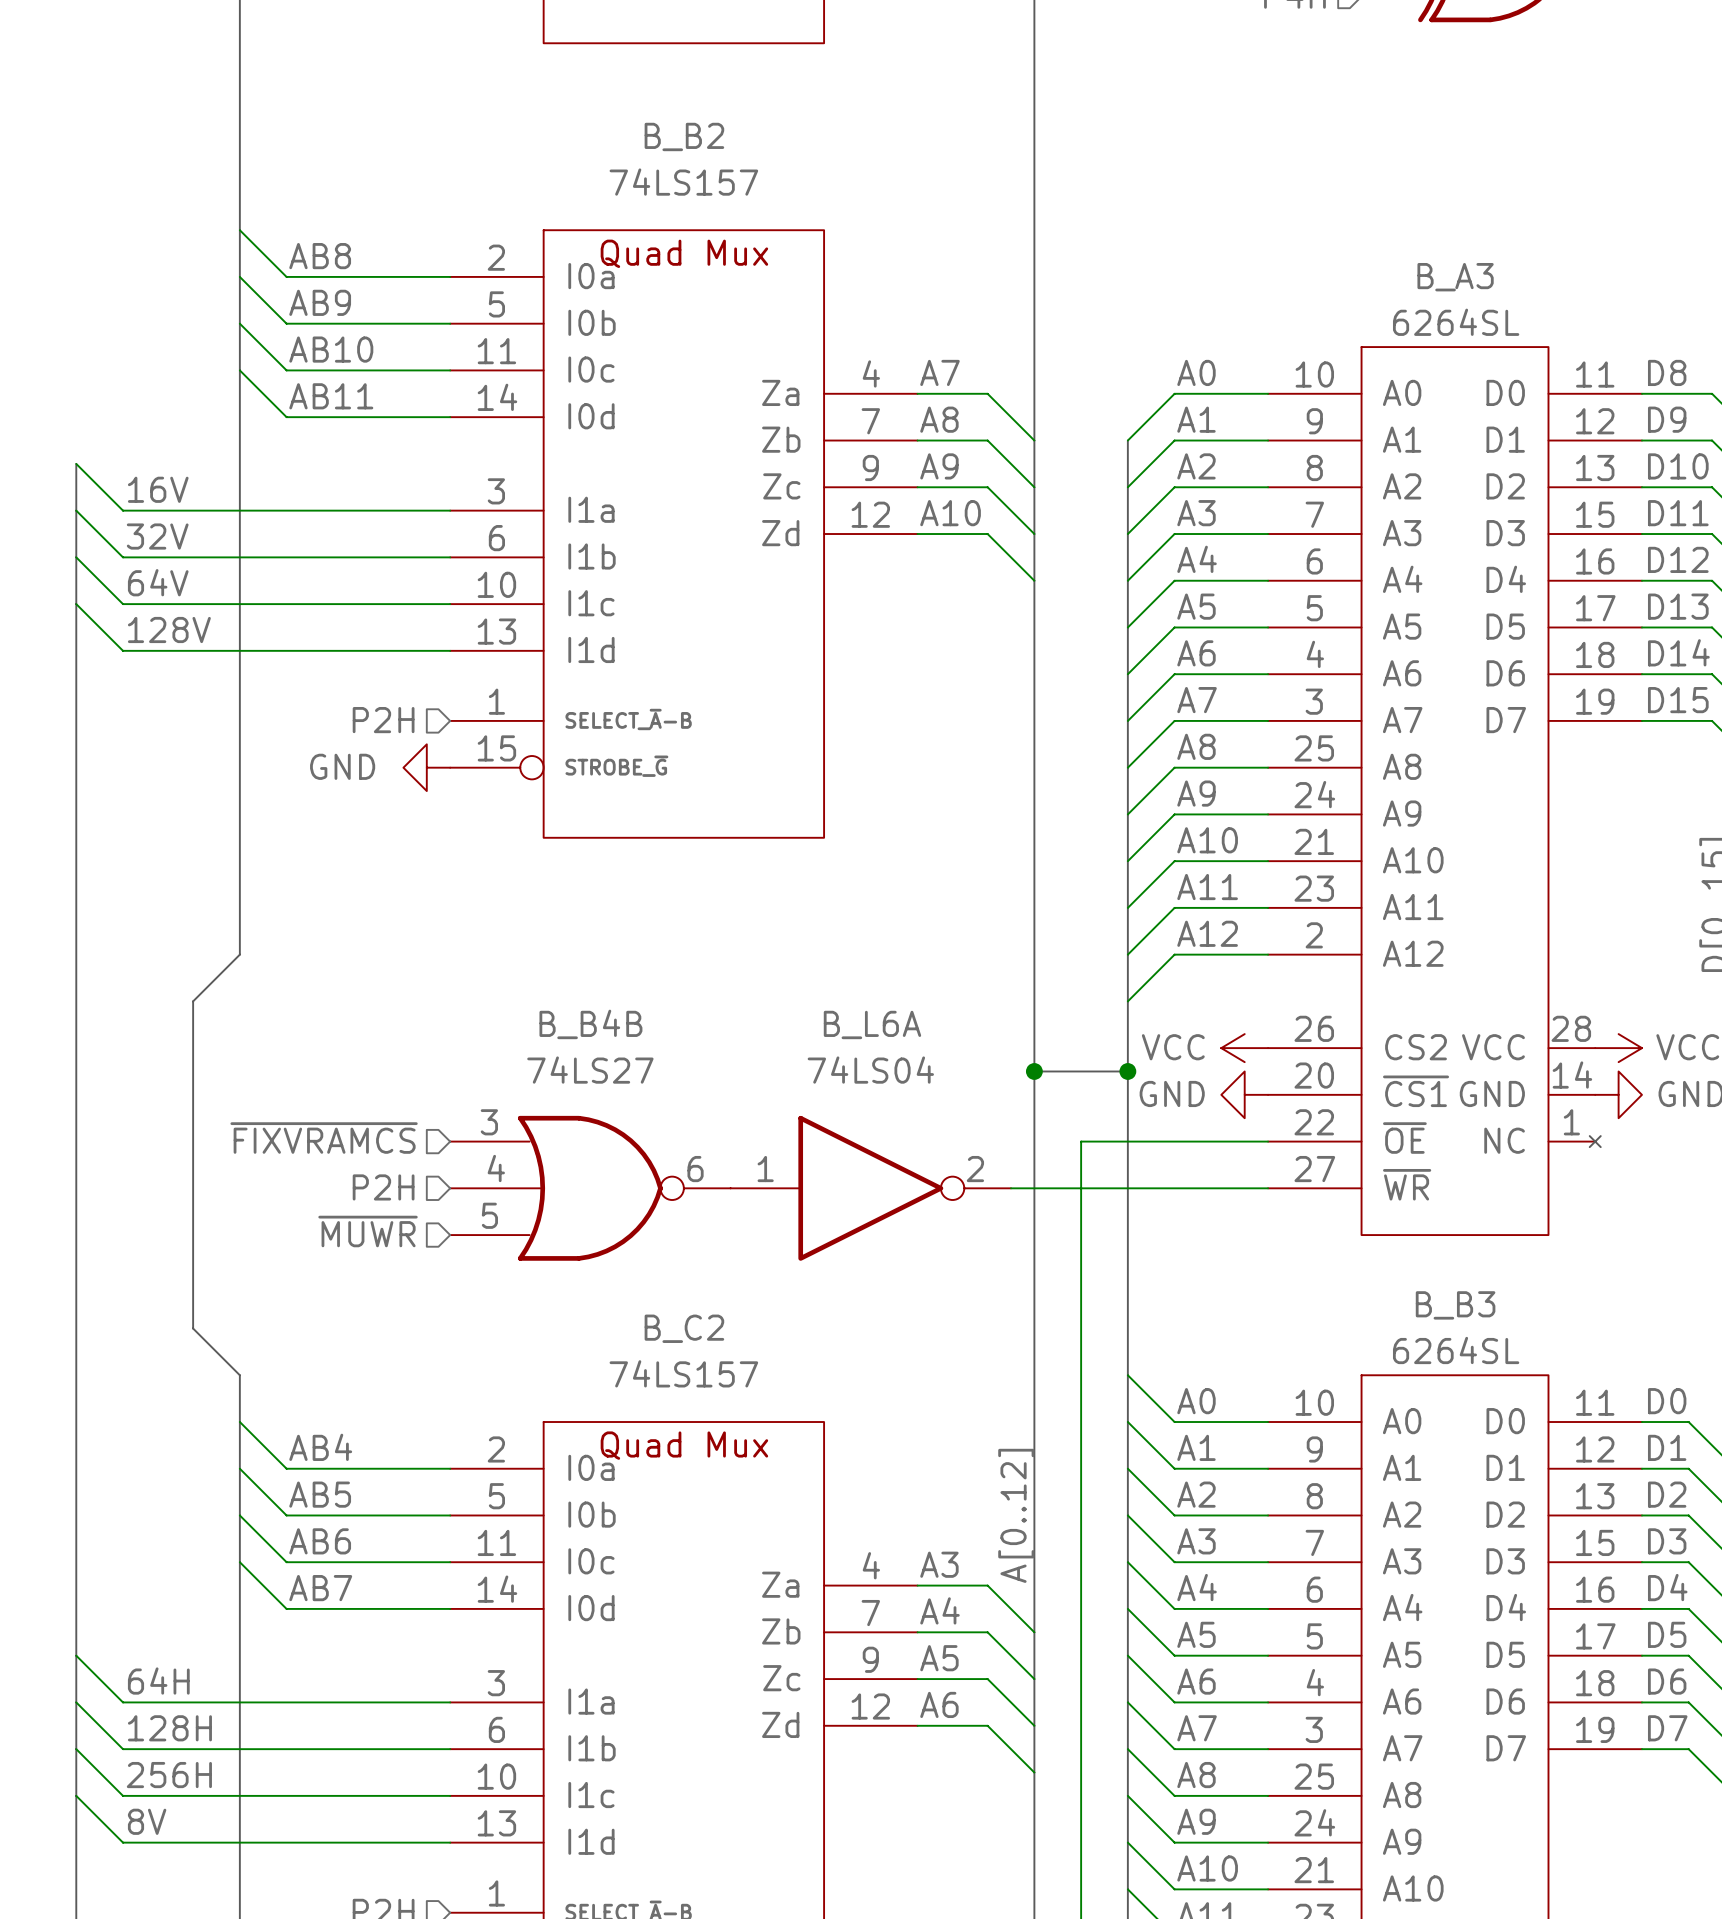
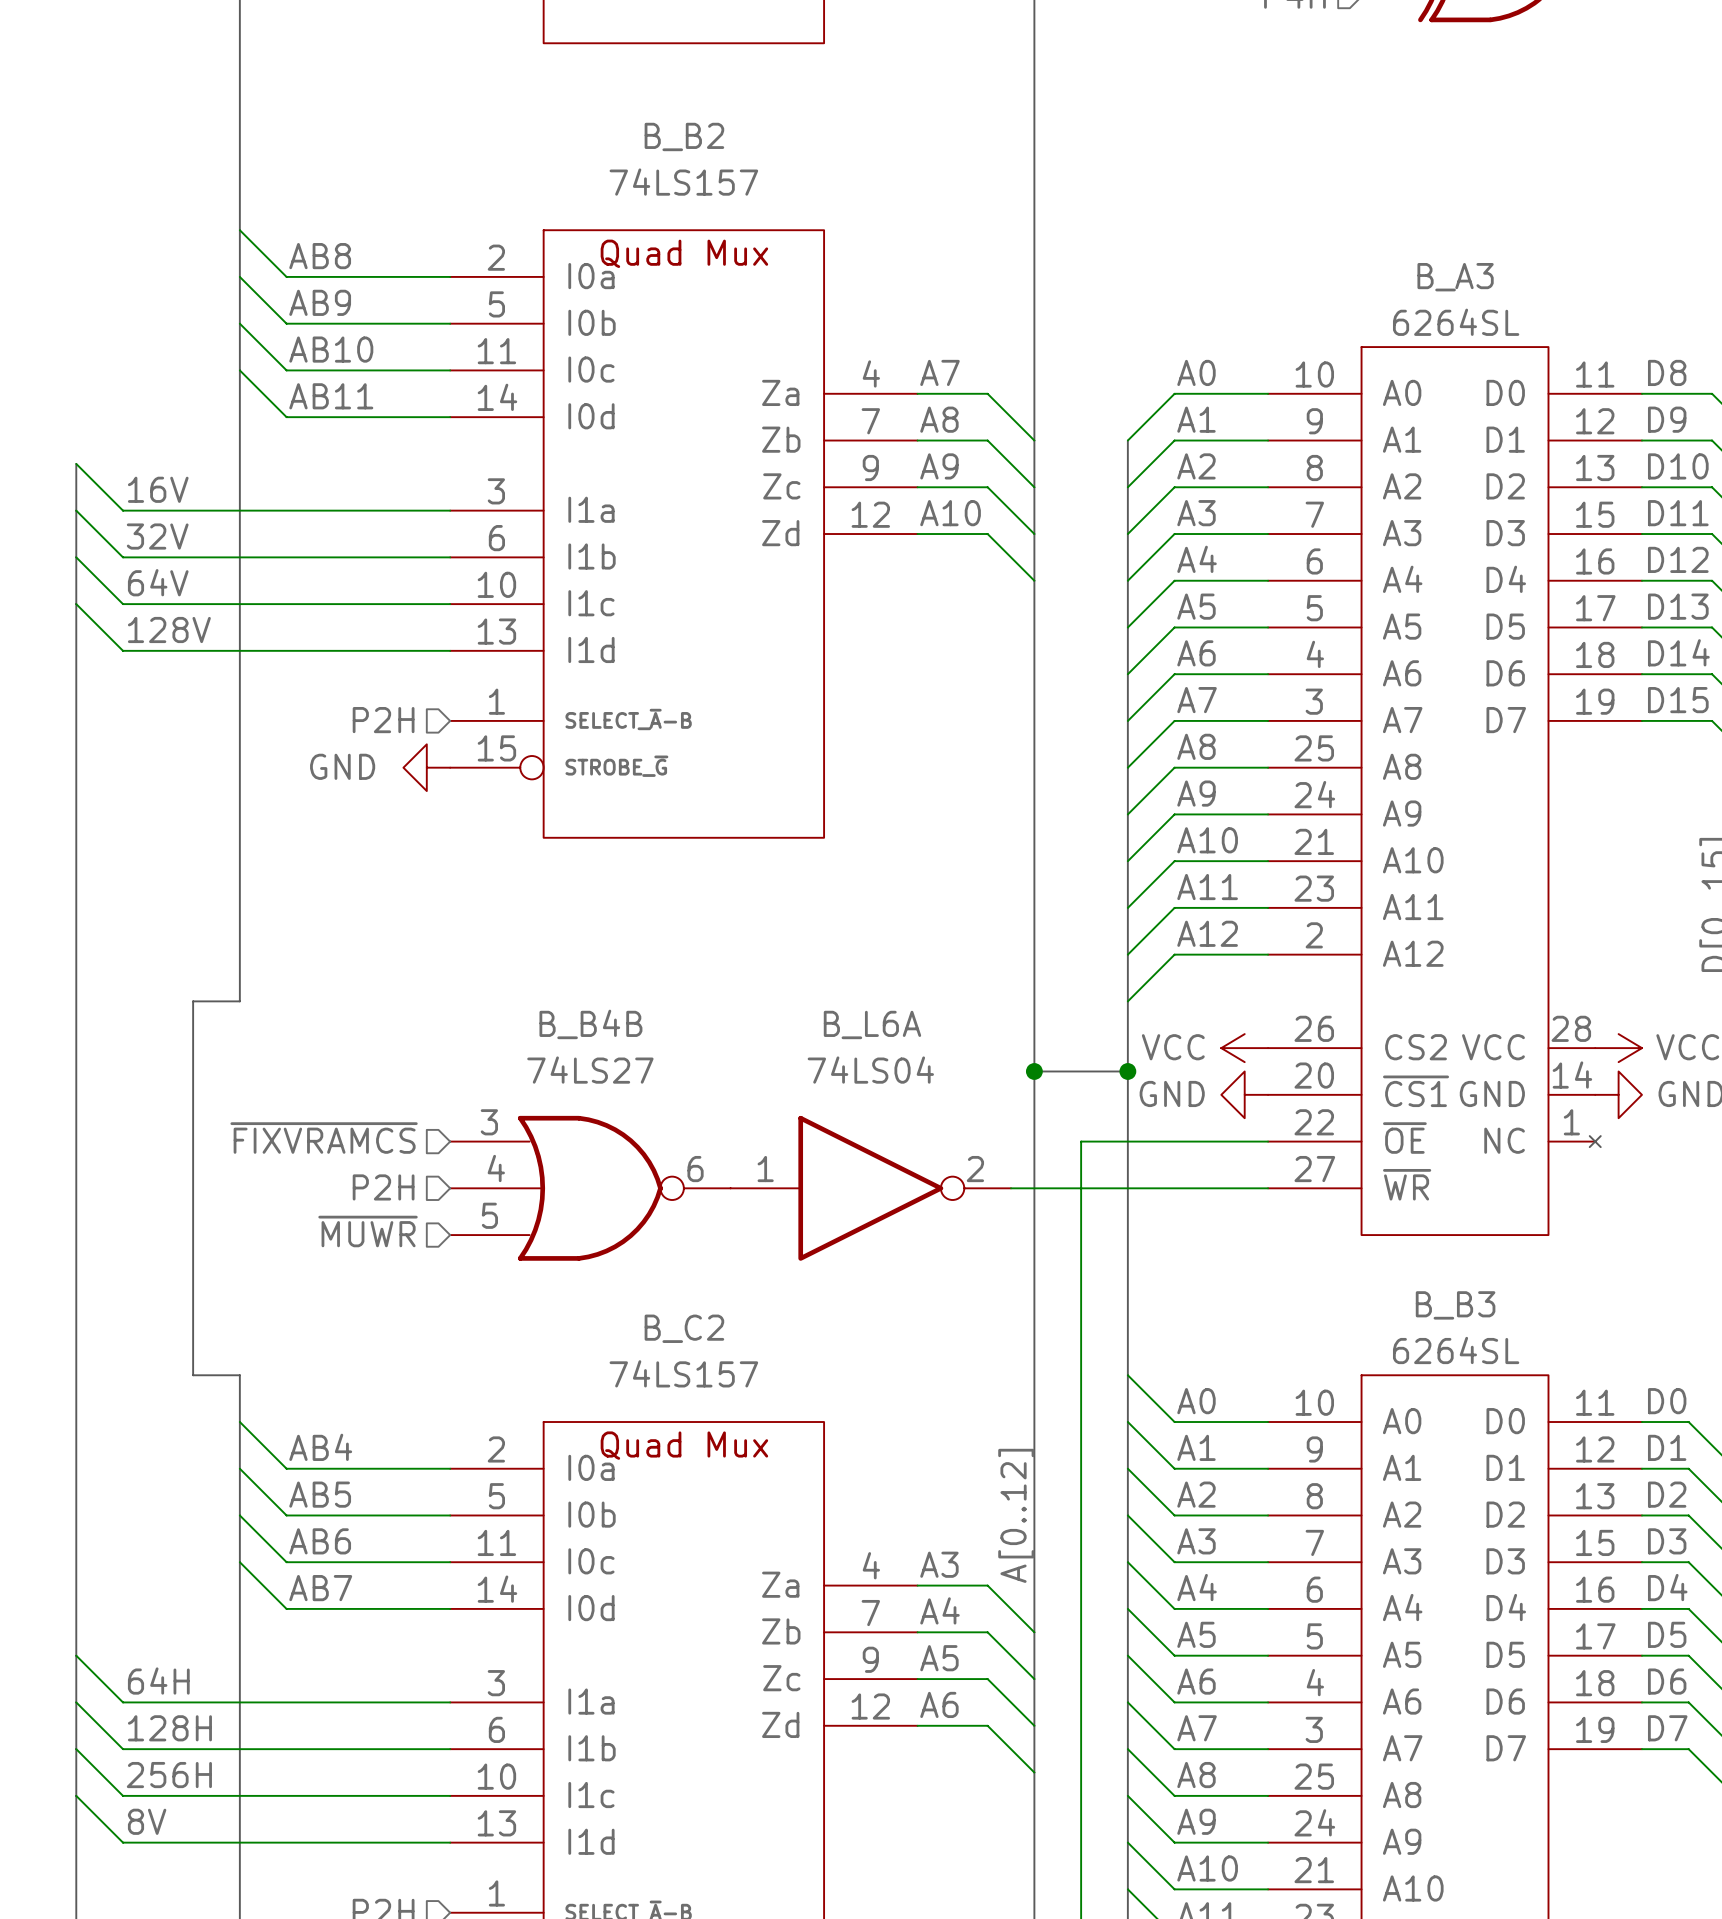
bus: (239, 954) (193, 1001) -> (239, 954) (239, 1001) (193, 1001)
bus: (193, 1328) (239, 1375) -> (193, 1328) (193, 1375) (239, 1375)

